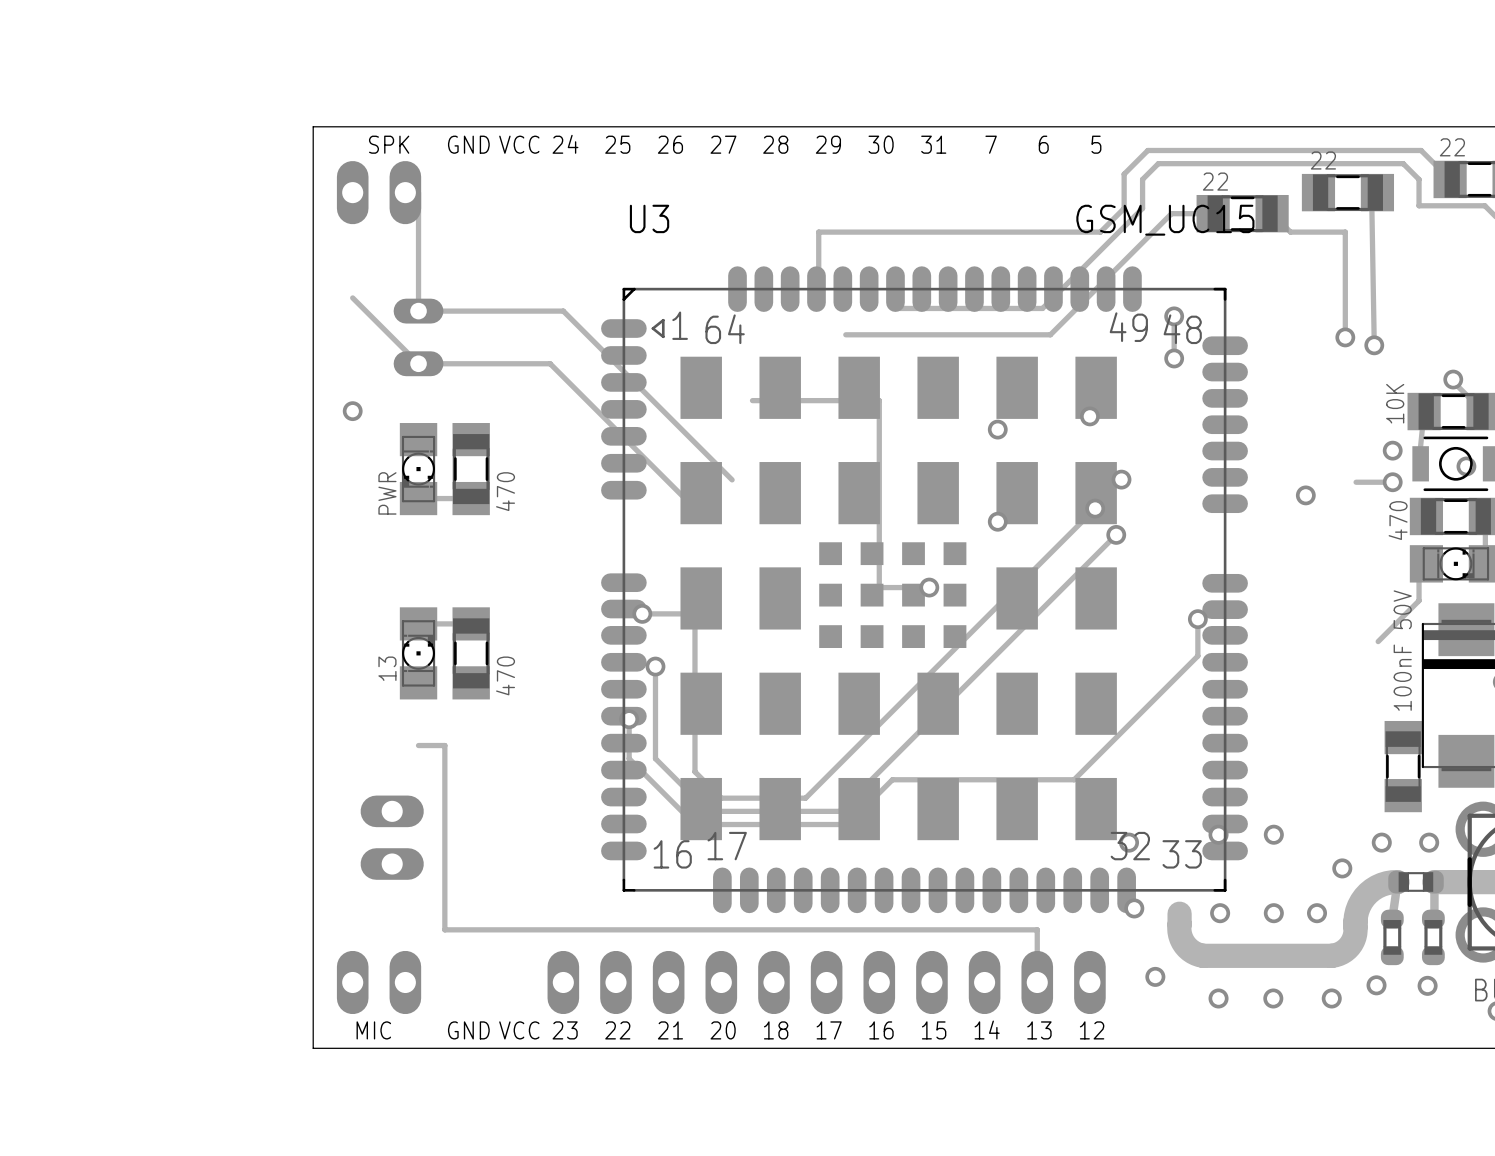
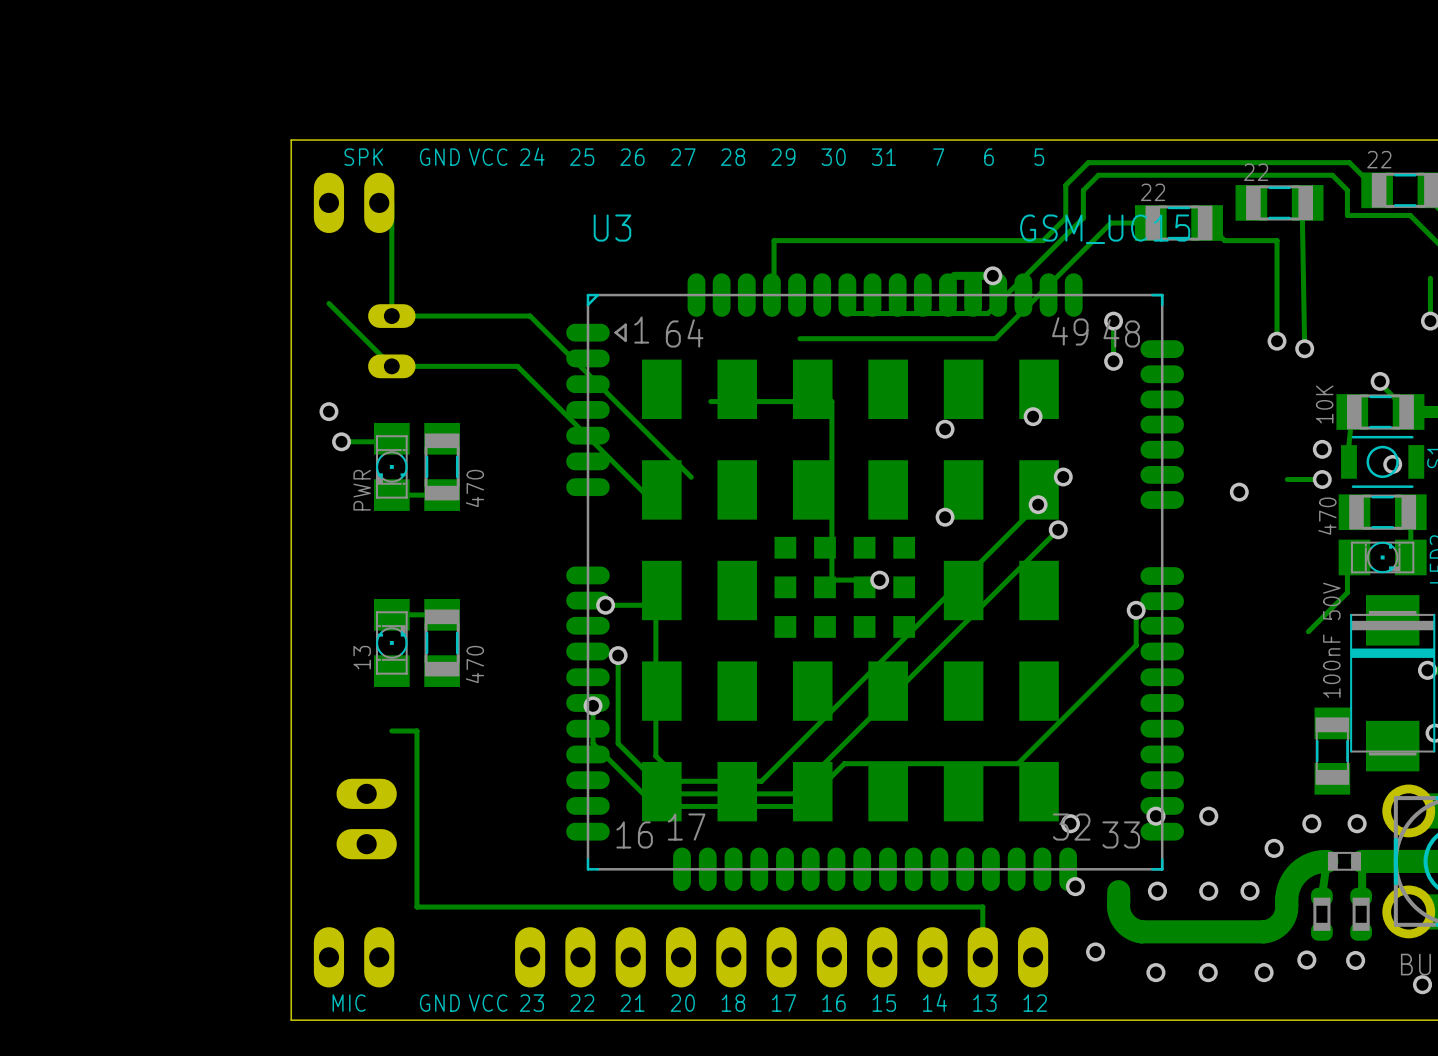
track: none -> (992, 275) (954, 275)
via: none -> (992, 275)
via: none -> (341, 441)
track: none -> (391, 441) (341, 441)

